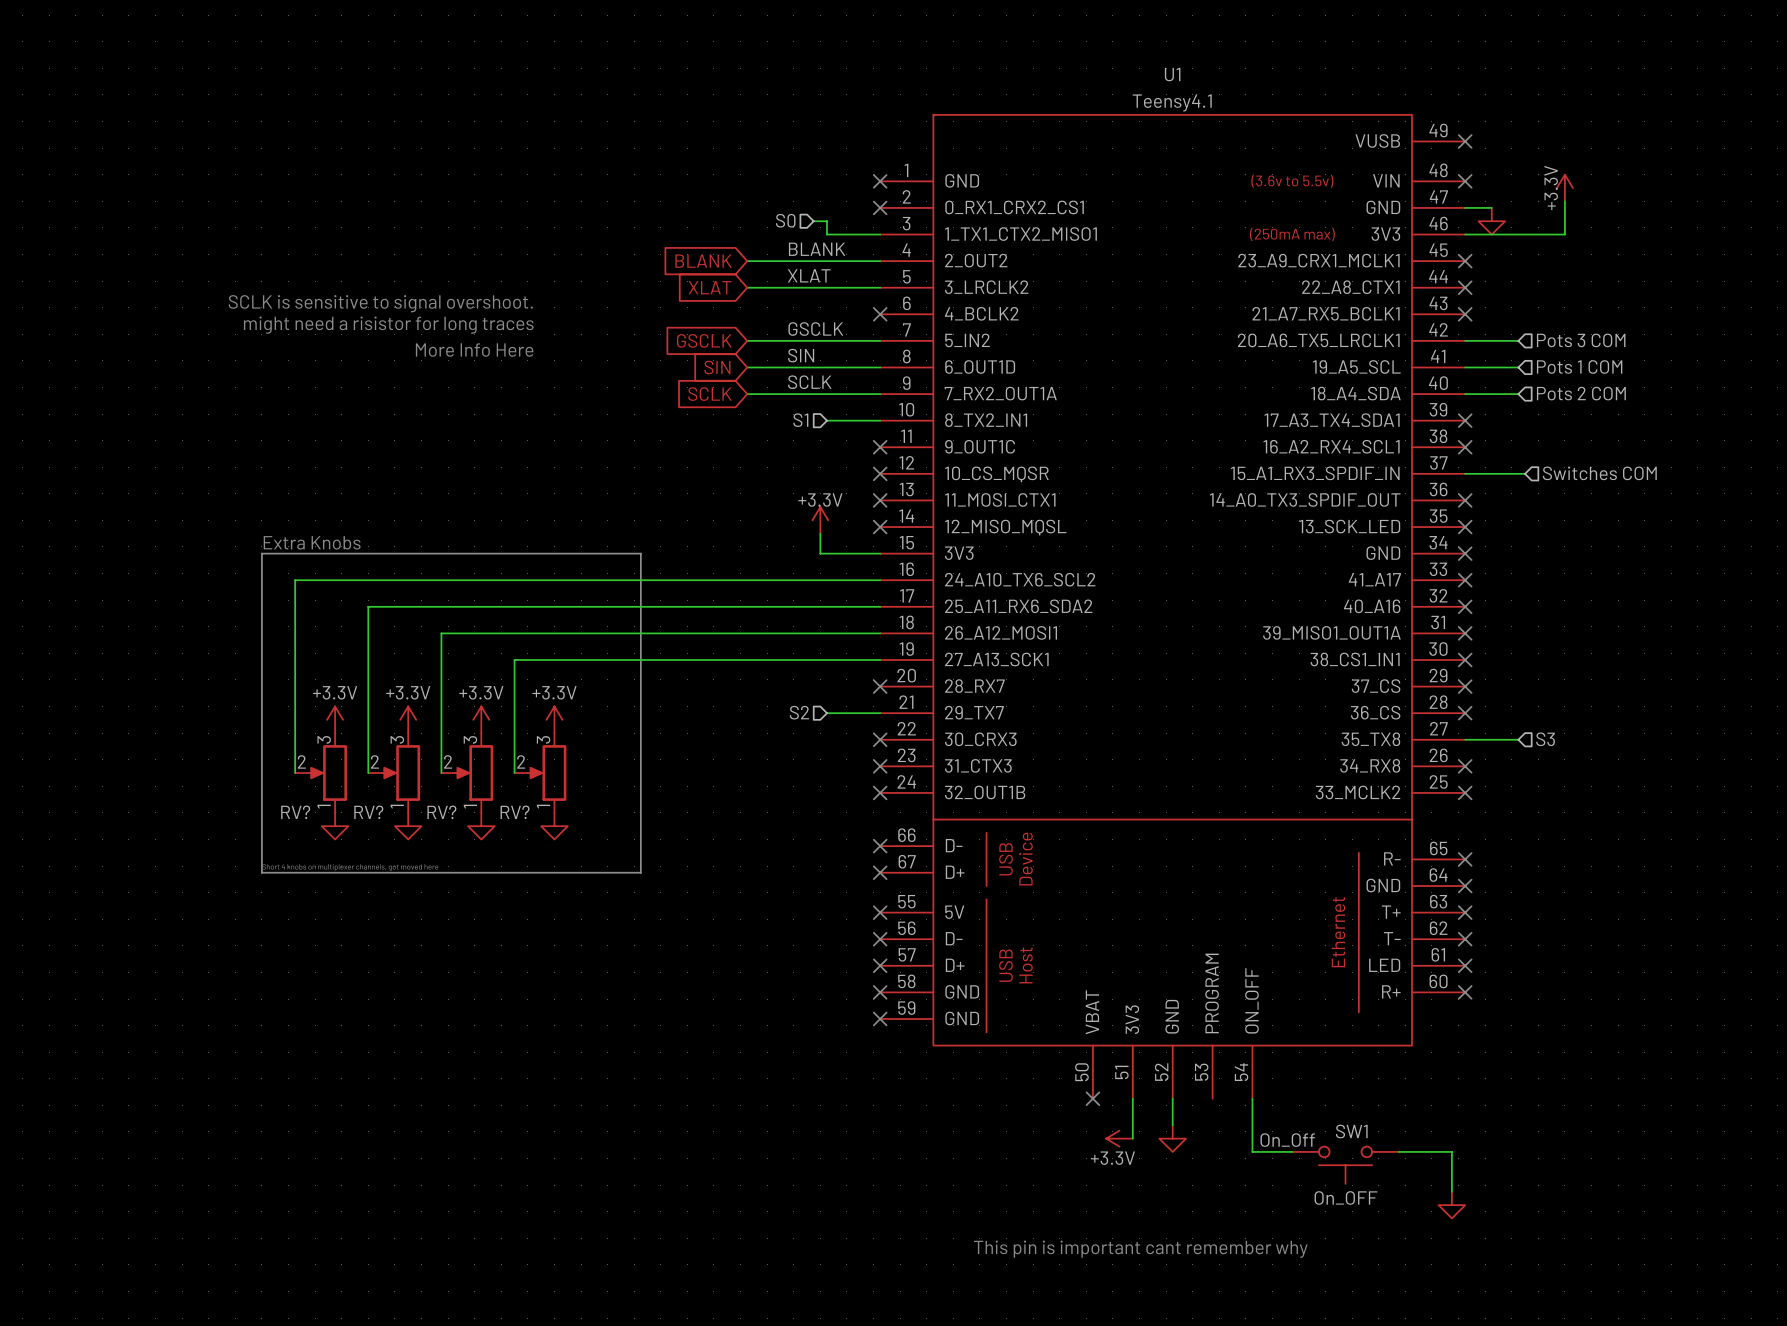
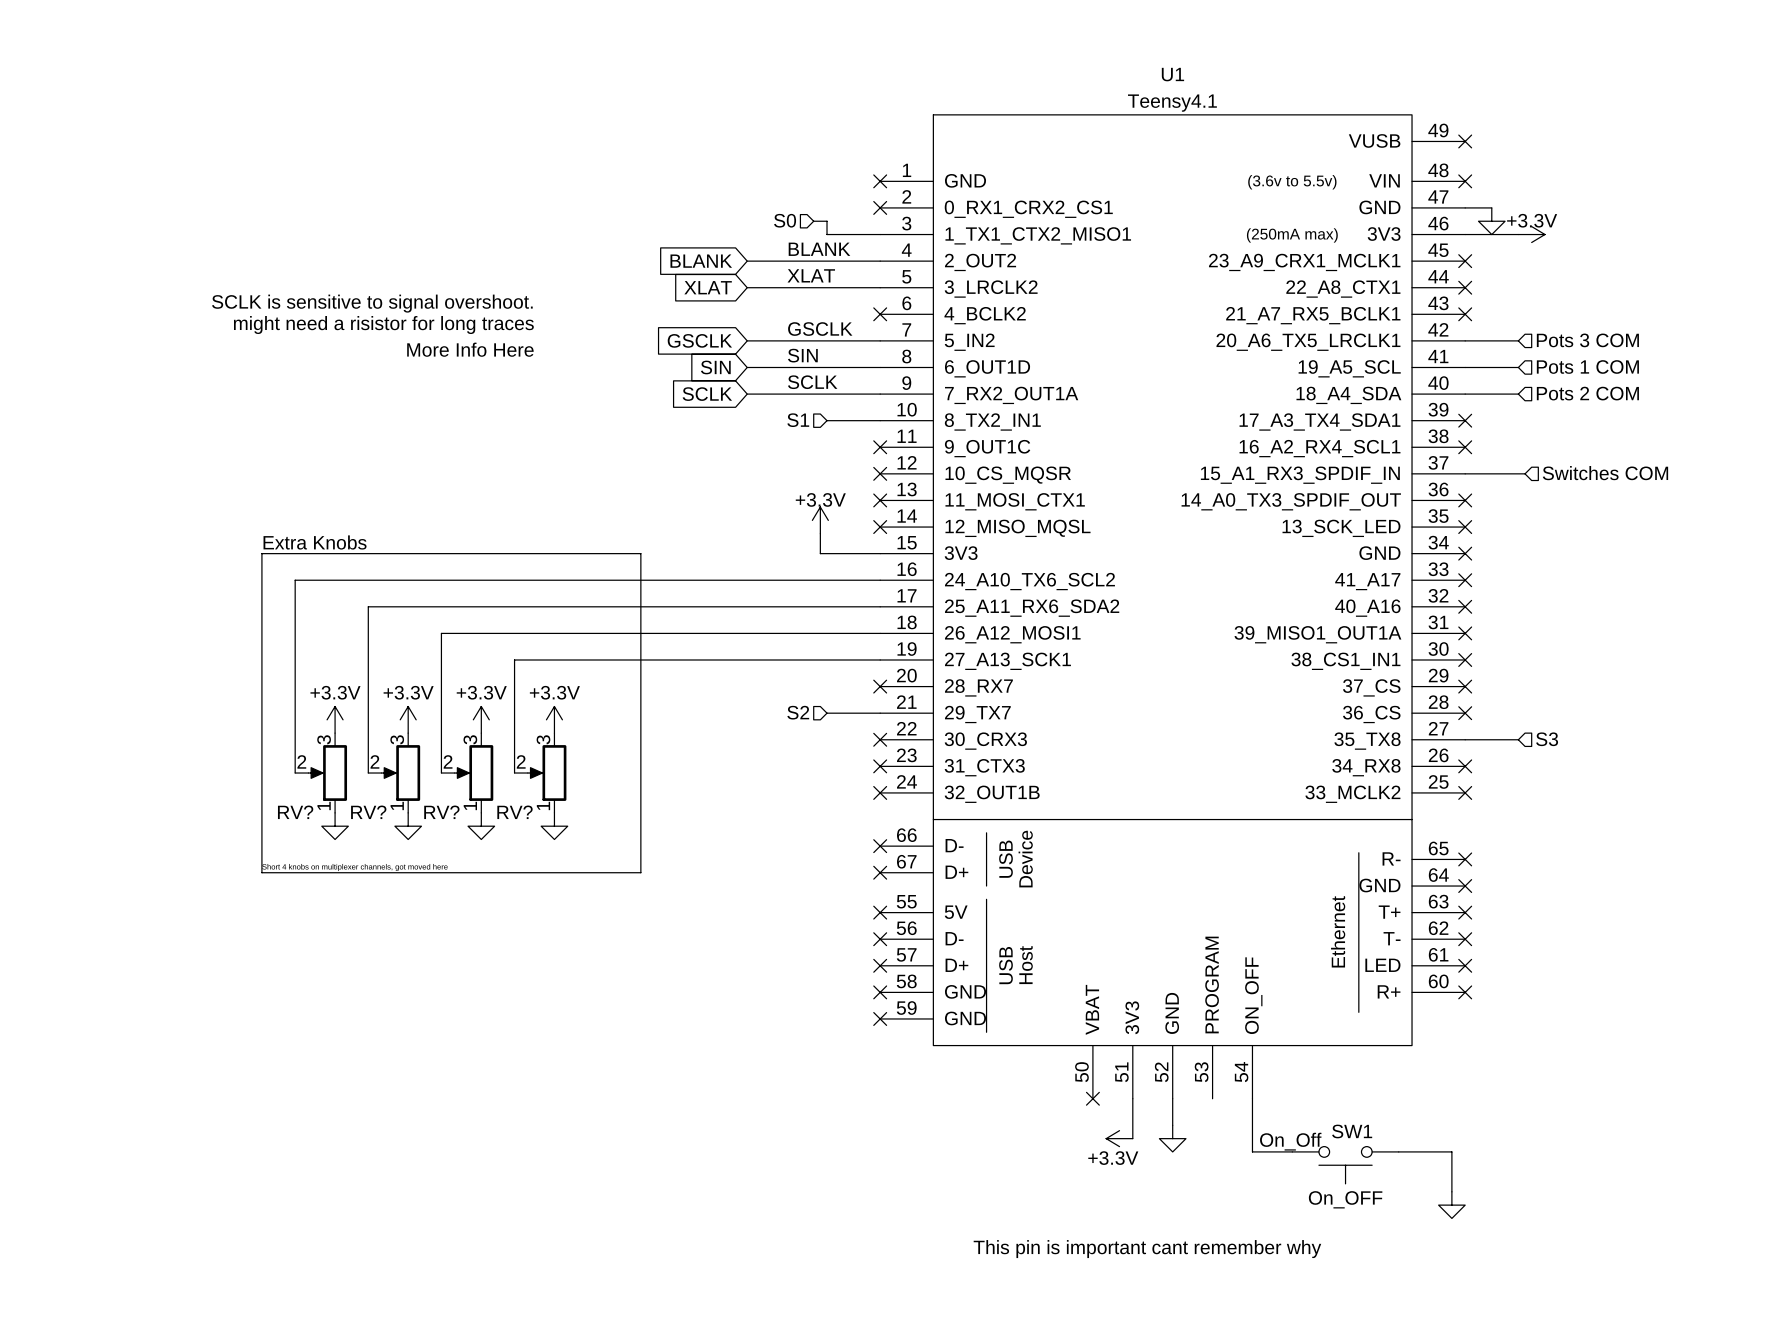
power symbol rotation: 0° (1564, 188) -> 90° clockwise (1531, 234)
power symbol position: +3.3V (1564, 188) -> +3.3V (1531, 234)
wire: (1564, 201) (1564, 234) (1518, 234) -> none

